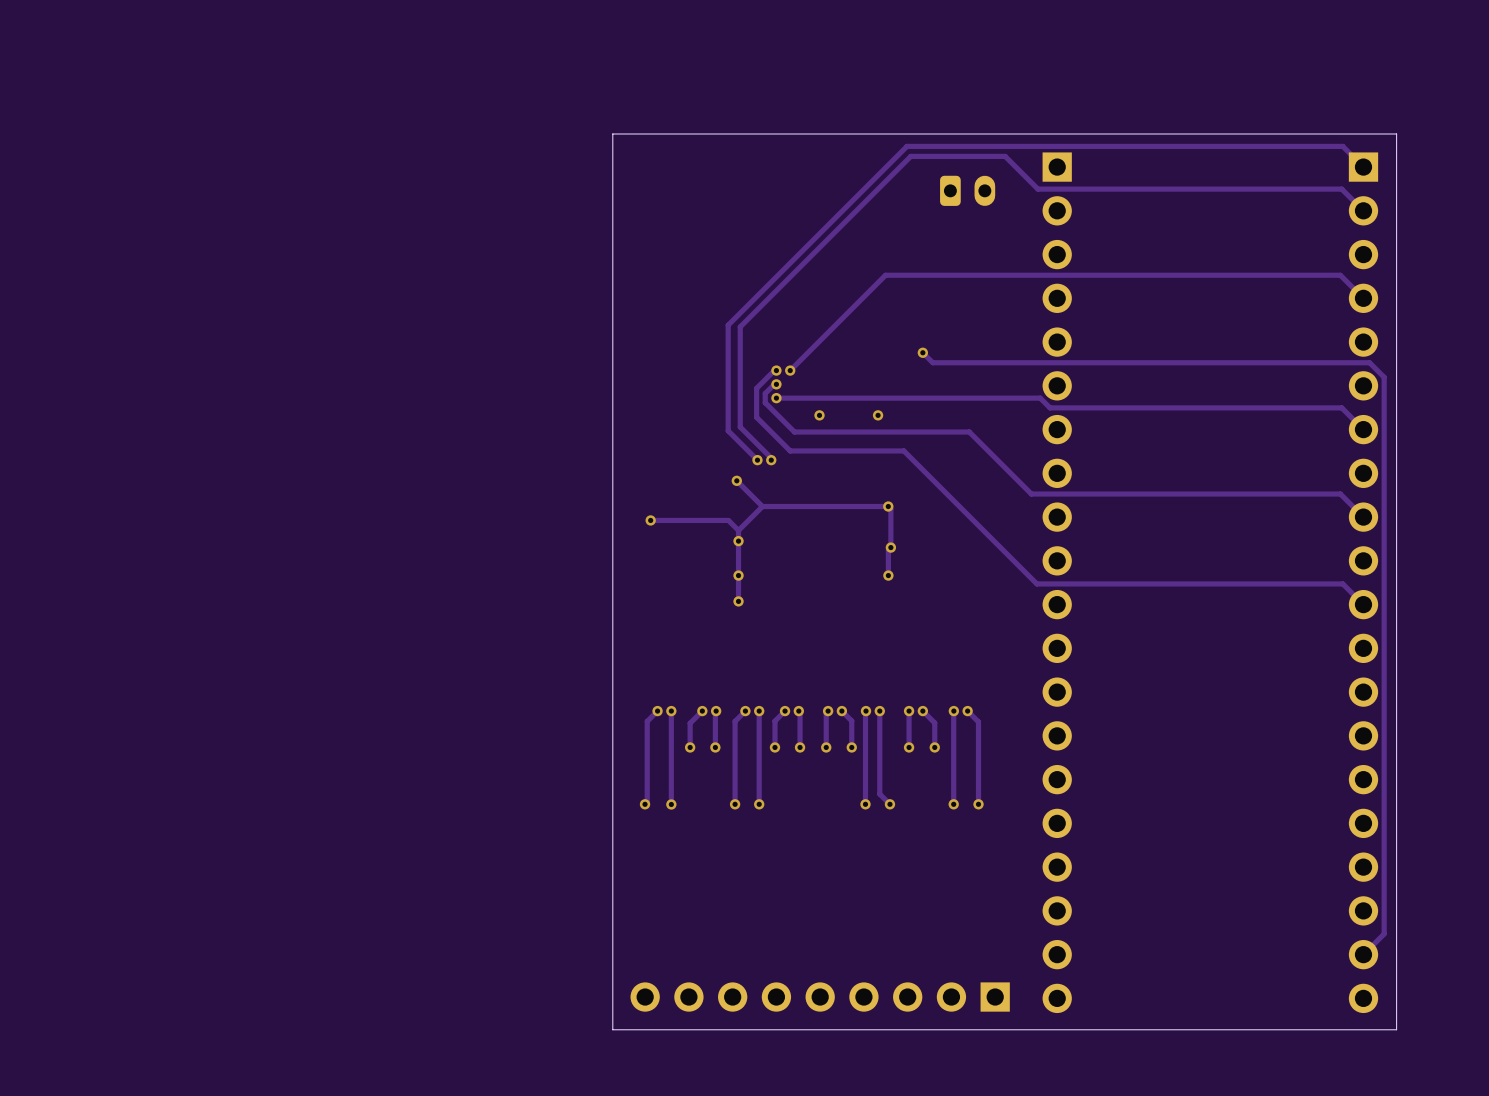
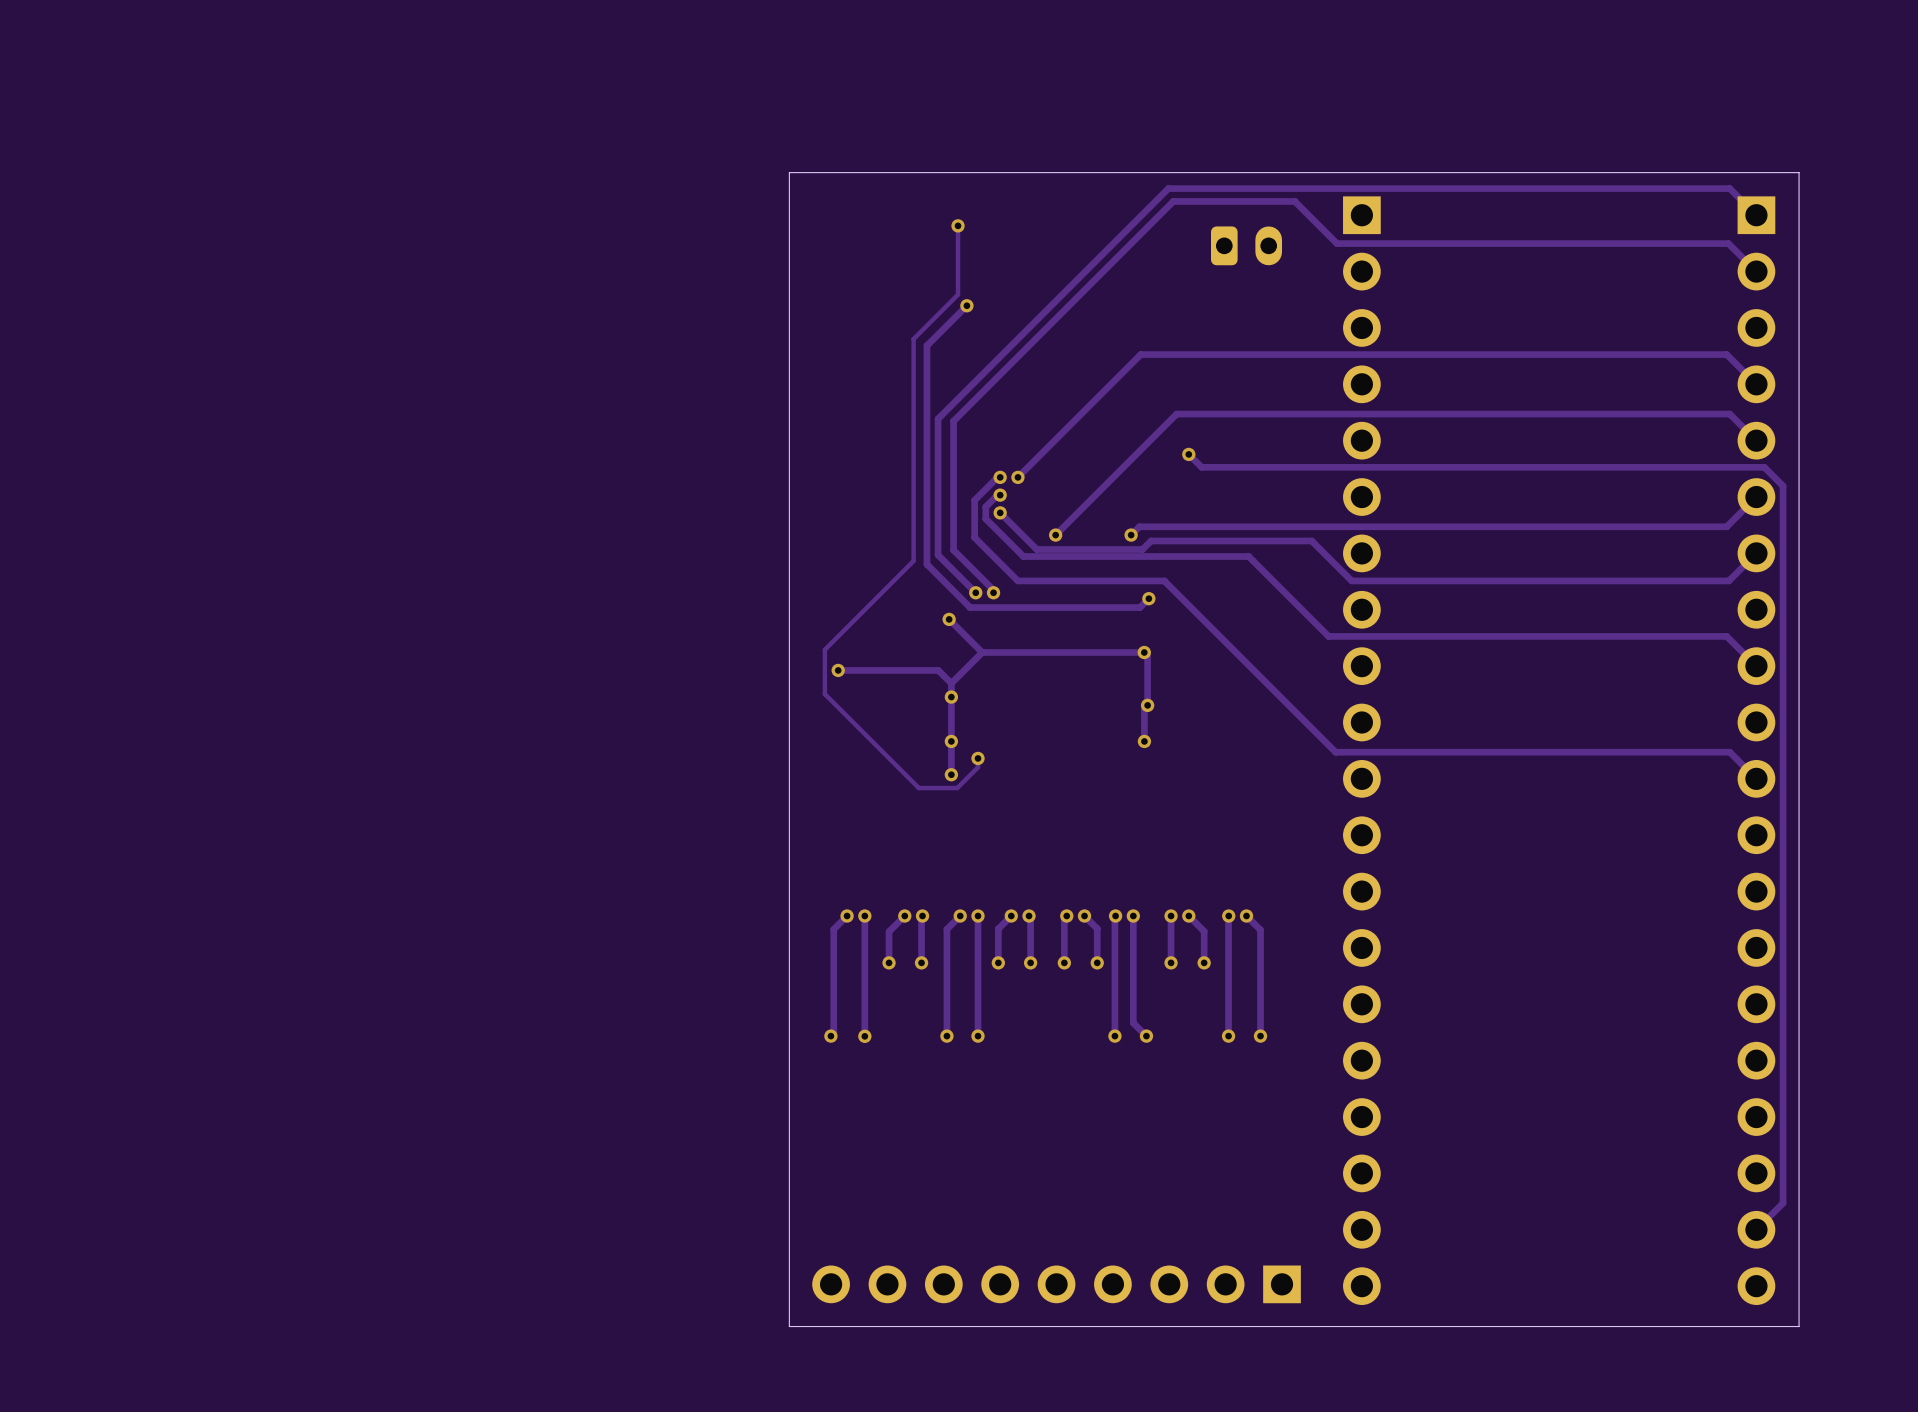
track: none -> (958, 225) (958, 294) (913, 339) (913, 560) (824, 649) (824, 694) (918, 788) (957, 788) (978, 767) (978, 758)
via: none -> (958, 225)
track: none -> (966, 305) (926, 345) (926, 564) (970, 607) (1139, 607) (1148, 598)
via: none -> (966, 305)
track: none -> (1756, 440) (1729, 414) (1176, 414) (1055, 535)
track: none -> (1756, 497) (1726, 526) (1139, 526) (1131, 535)
track: (776, 398) (1040, 398) (1050, 407) (1341, 407) (1363, 429) -> (1000, 512) (1036, 549) (1142, 549) (1151, 540) (1311, 540) (1351, 580) (1728, 580) (1756, 553)
via: none -> (1148, 598)
via: none -> (978, 758)

